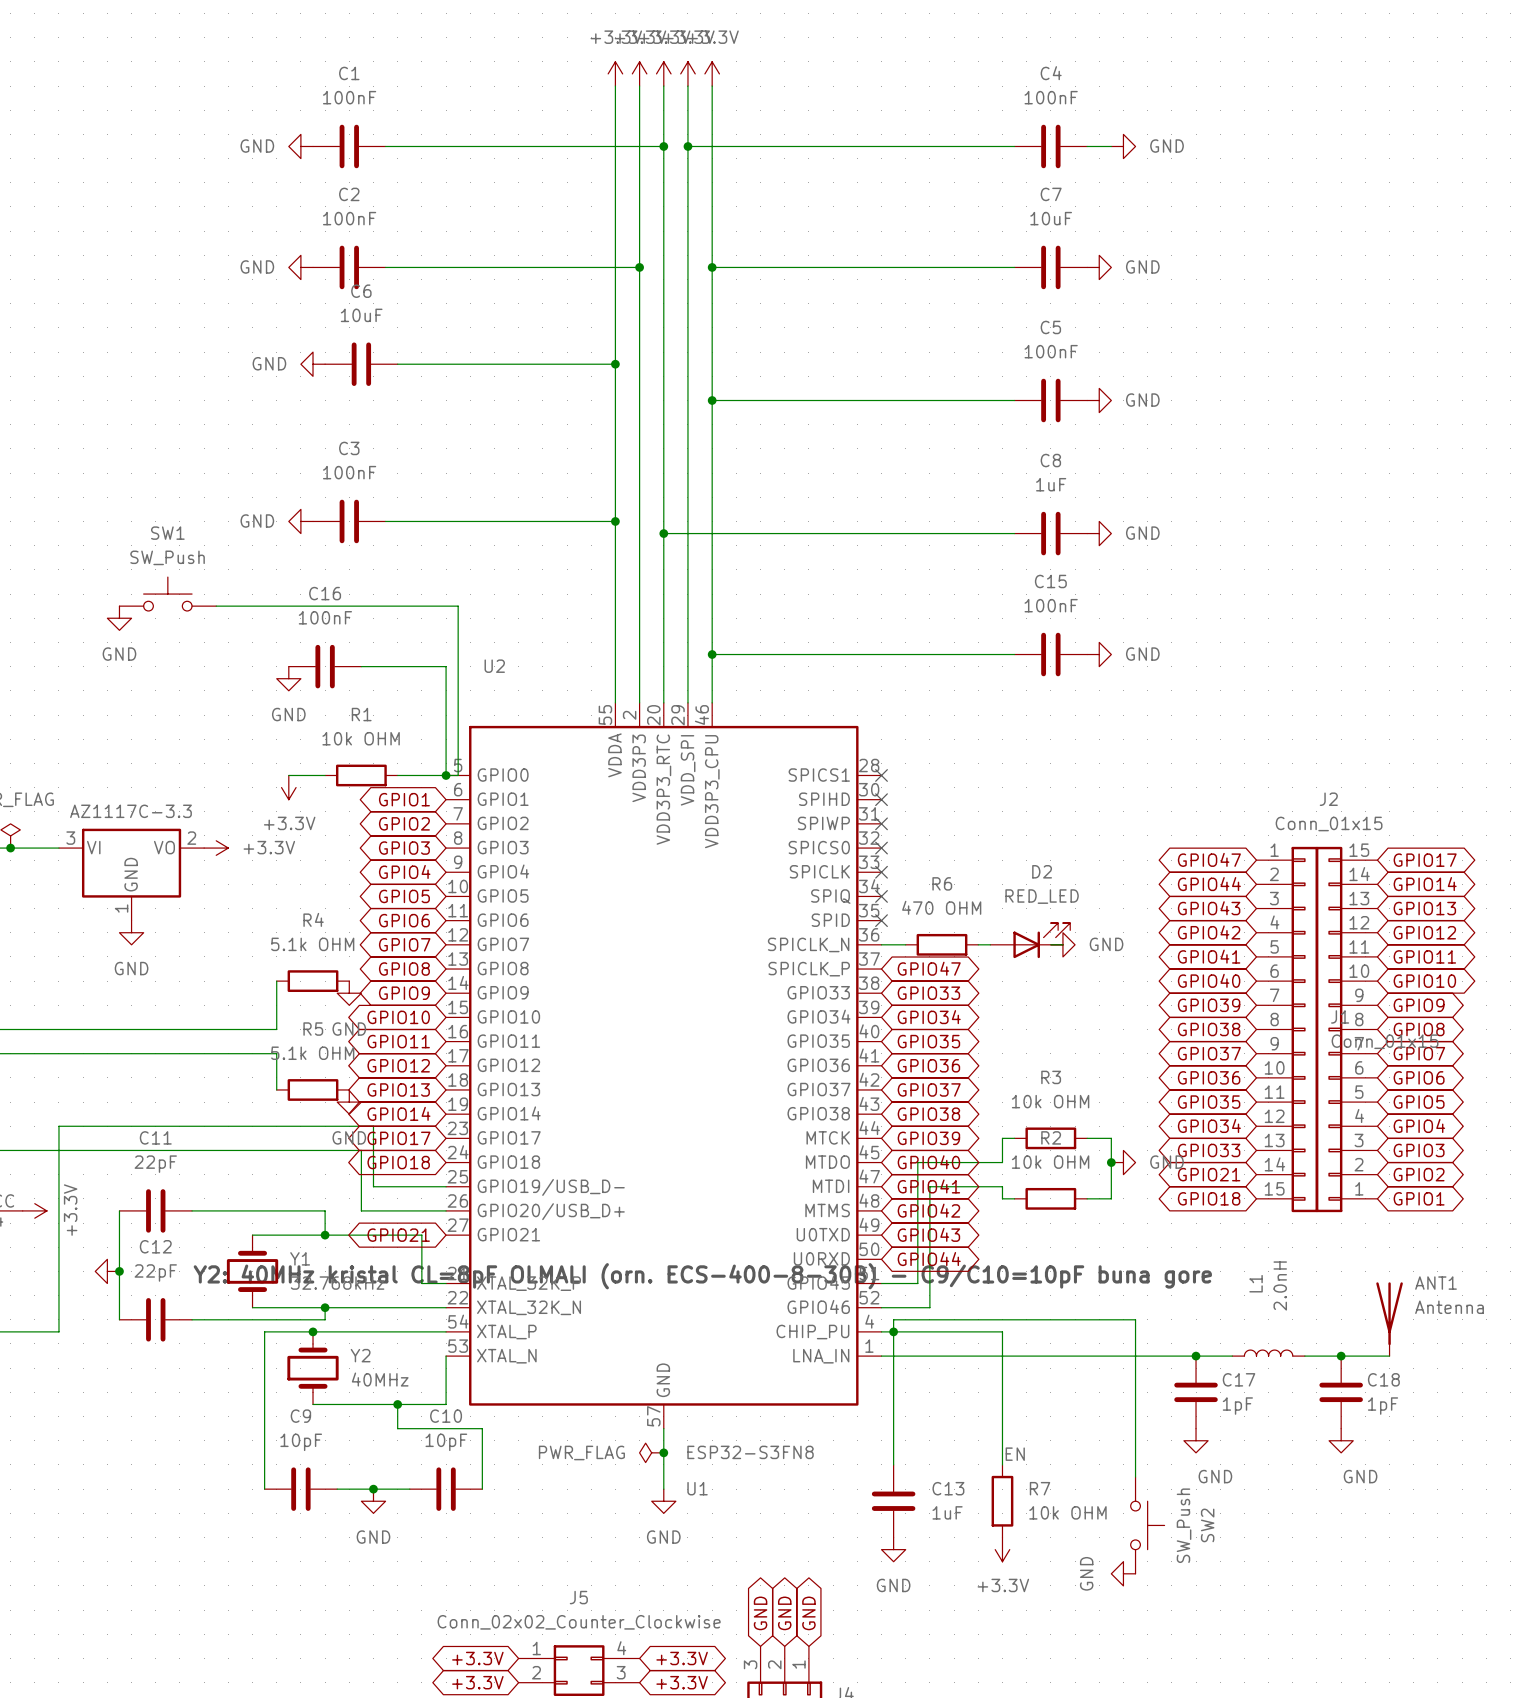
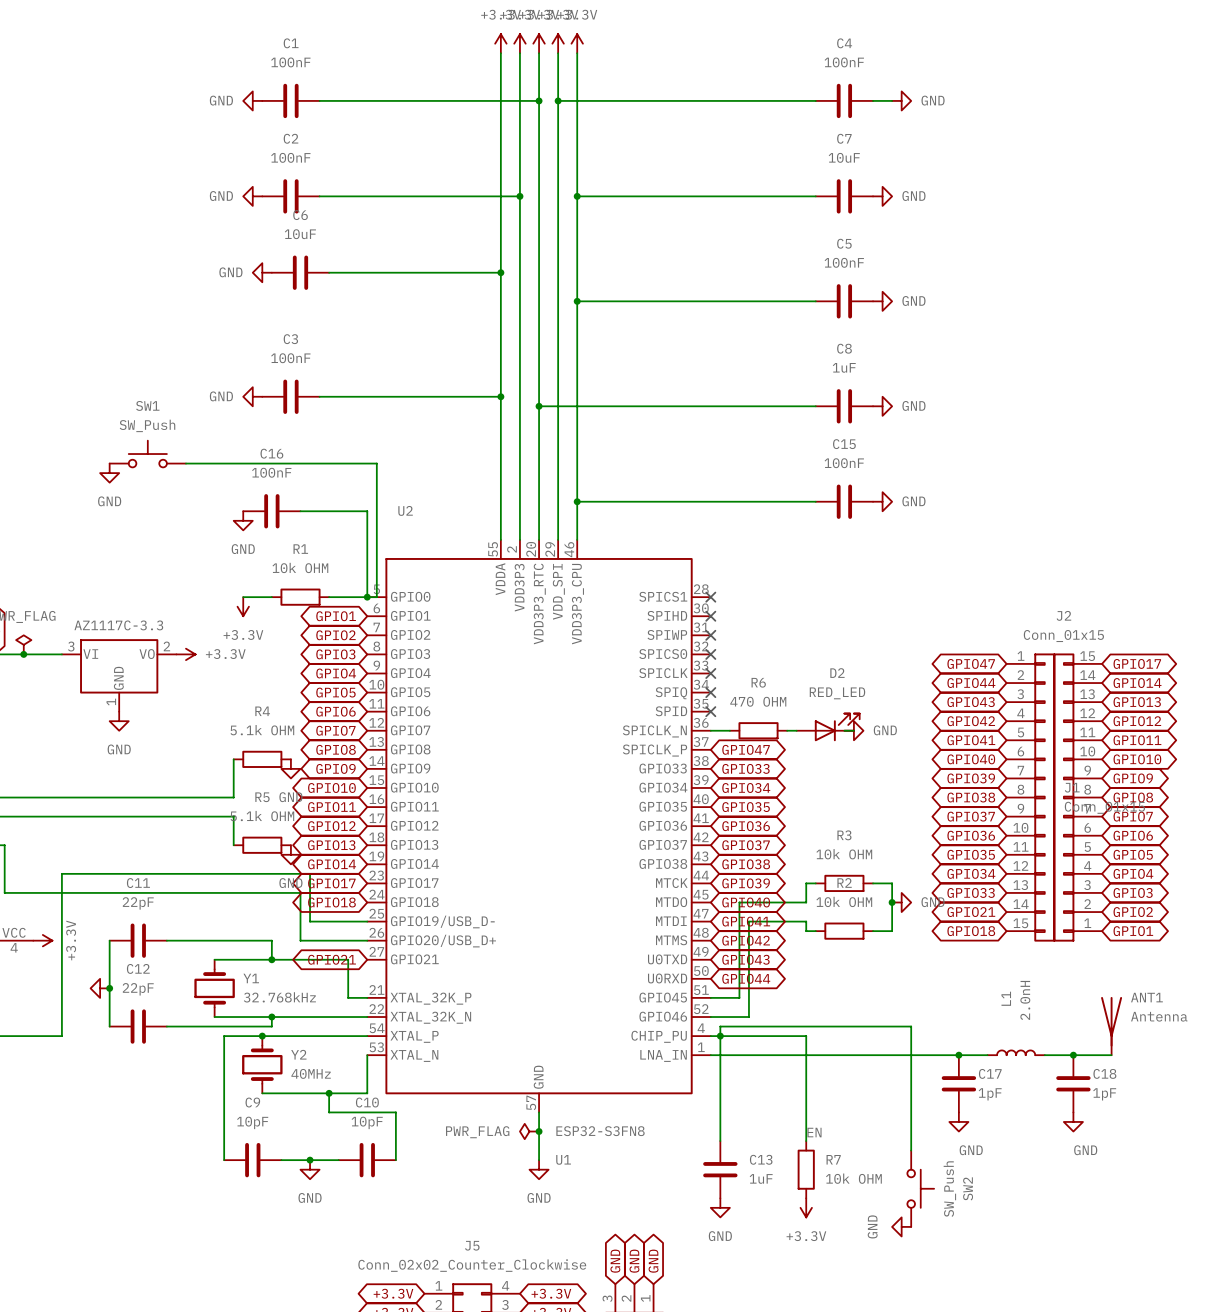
text: Y2: 40MHz kristal CL=8pF OLMALI (orn. ECS-400-8-30B) - C9/C10=10pF buna gore (702, 1276) -> none

